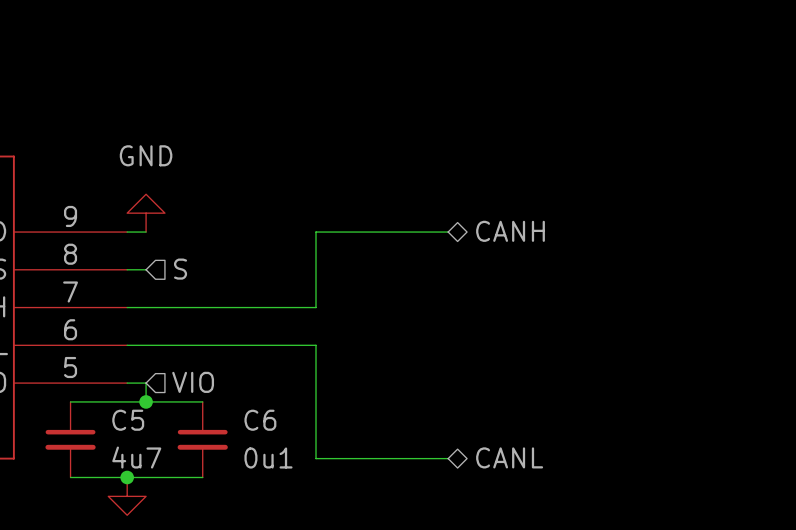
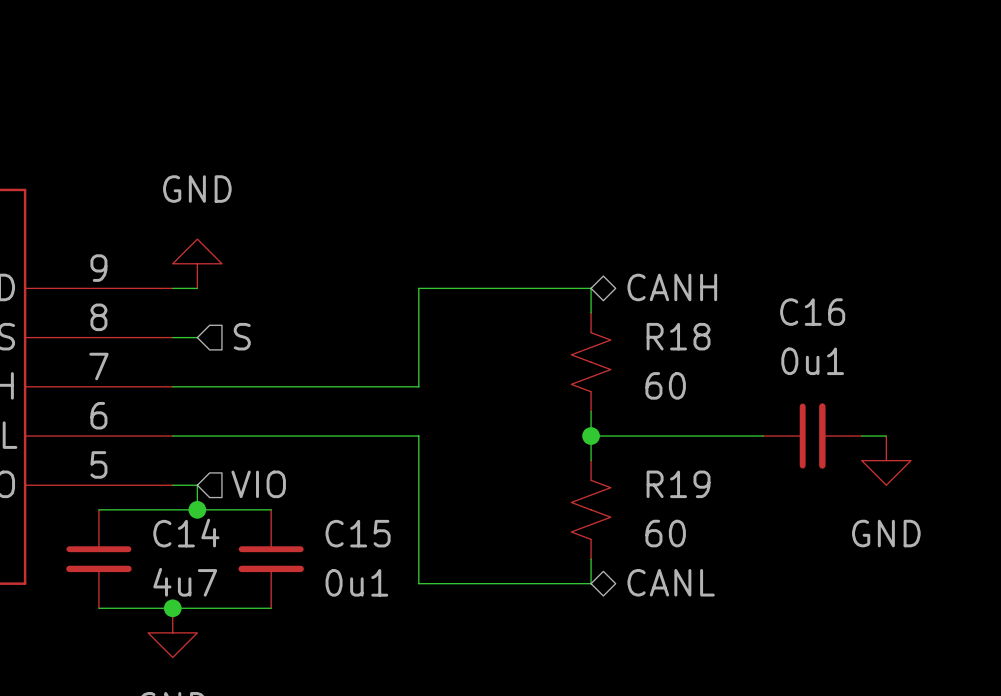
wire: none -> (591, 288) (591, 312)
R18: none -> 60 (591, 362)
wire: none -> (591, 411) (591, 460)
wire: none -> (591, 436) (763, 436)
junction: none -> (591, 436)
C16: none -> 0u1 (812, 436)
wire: none -> (861, 436) (886, 436)
power symbol: none -> GND (886, 460)
R19: none -> 60 (591, 509)
C5 name: C5 (128, 420) -> C14 (186, 533)
C6 name: C6 (260, 420) -> C15 (358, 533)
wire: none -> (591, 559) (591, 583)

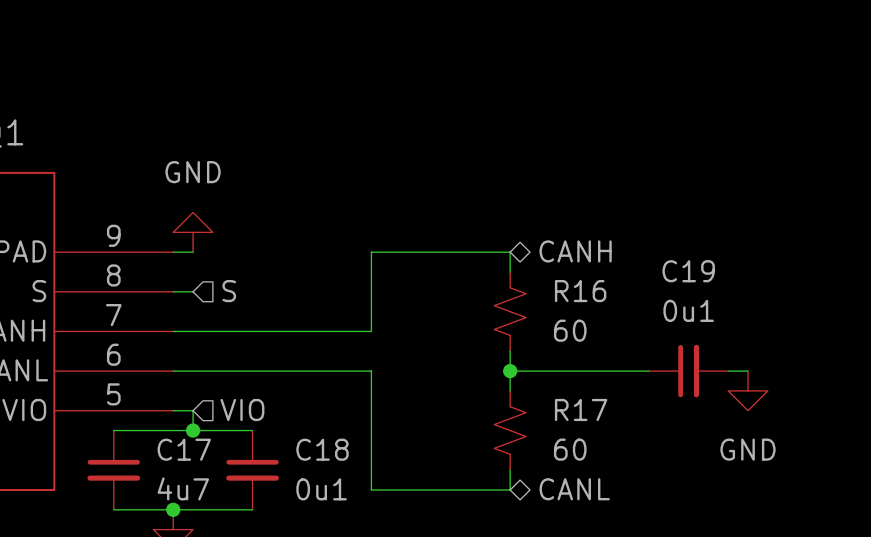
C16 name: C16 (812, 312) -> C19 (688, 271)
R18 name: R18 (678, 336) -> R16 (580, 291)
R19 name: R19 (678, 484) -> R17 (581, 409)
C14 name: C14 (186, 533) -> C17 (184, 449)
C15 name: C15 (358, 533) -> C18 (322, 449)

